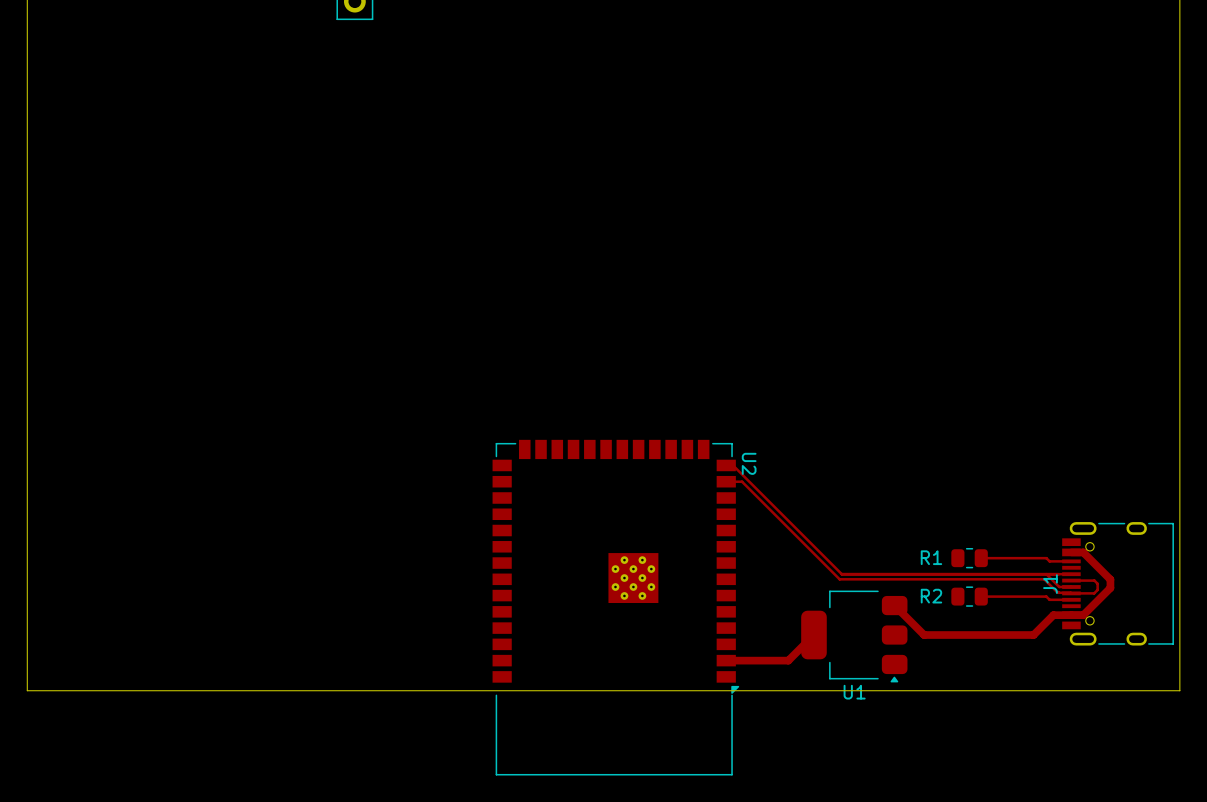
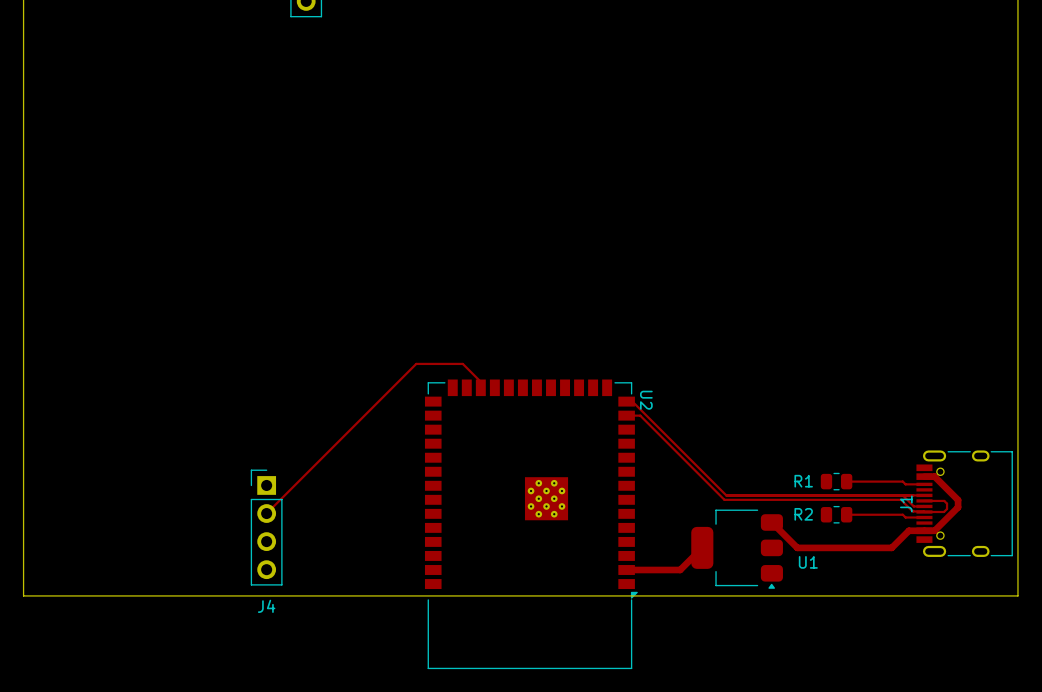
track: none -> (480, 387) (480, 381) (462, 363) (416, 363) (266, 513)
J4: none -> (266, 527)
U1 name position: U1 (854, 692) -> U1 (808, 562)

